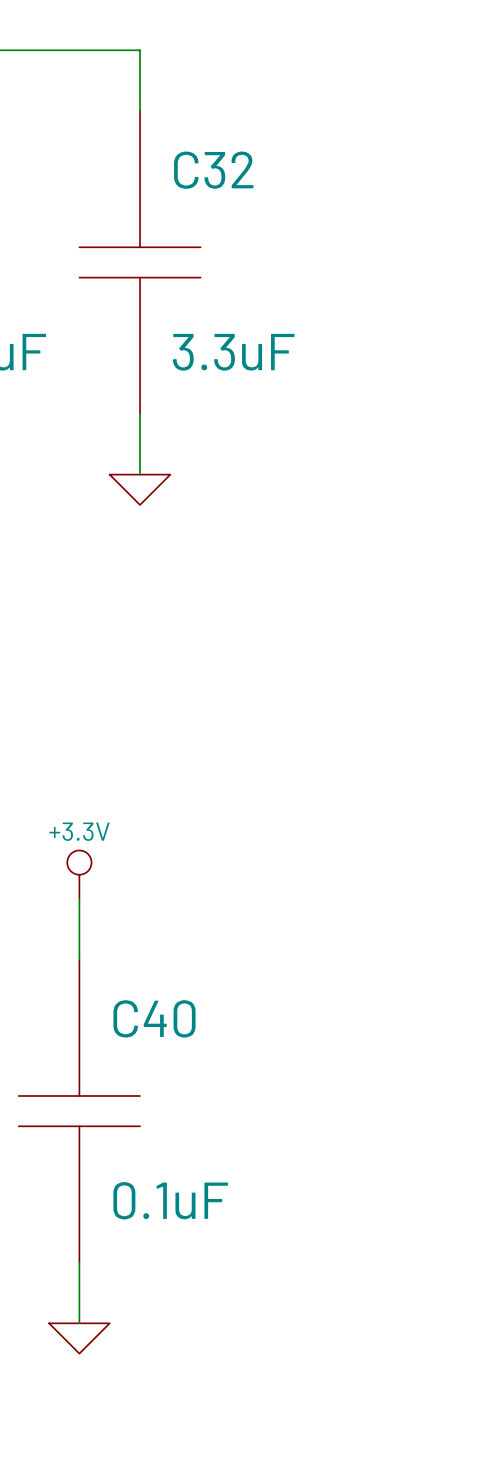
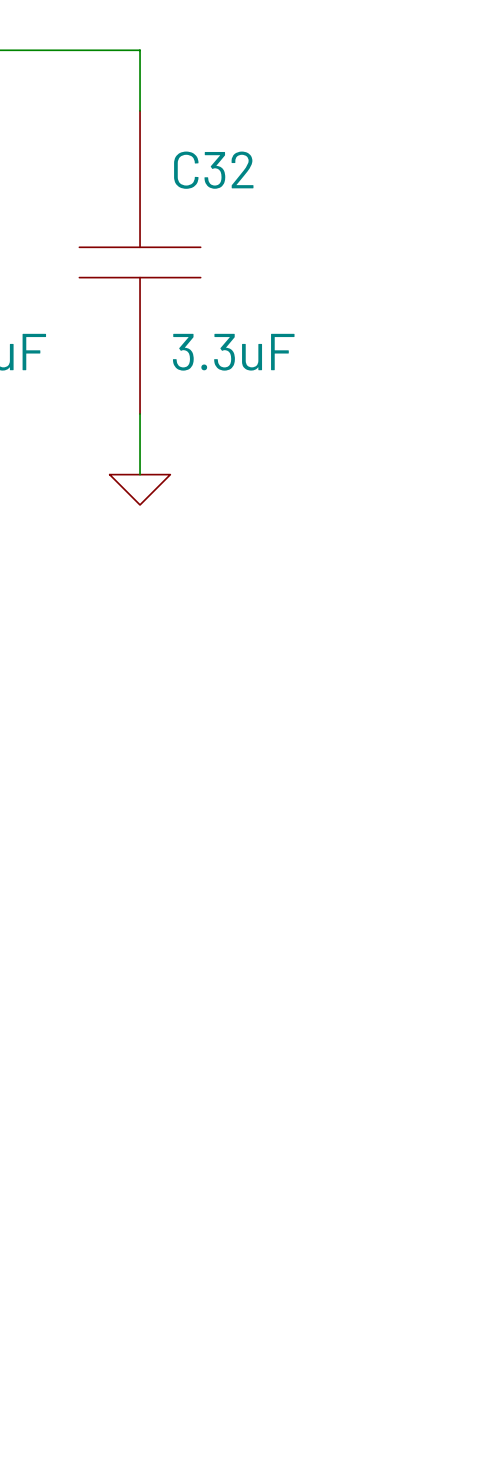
power symbol: +3.3V (79, 874) -> none
wire: (79, 898) (79, 959) -> none
C40: 0.1uF (79, 1111) -> none
wire: (79, 1262) (79, 1323) -> none
power symbol: (79, 1338) -> none

